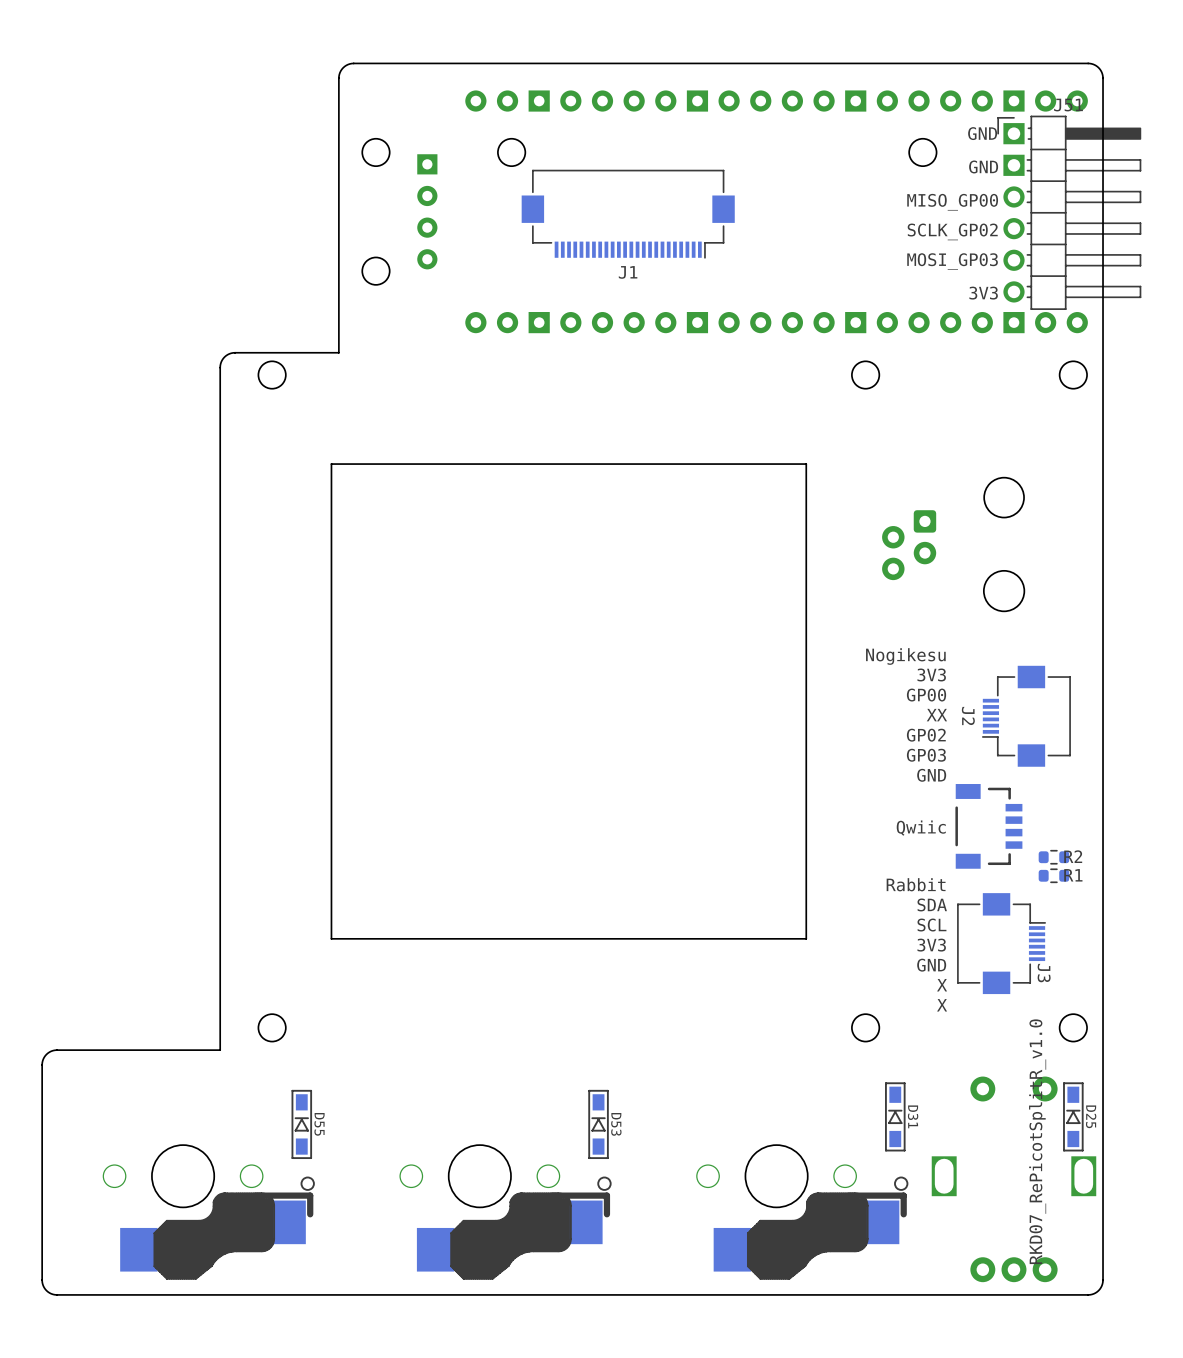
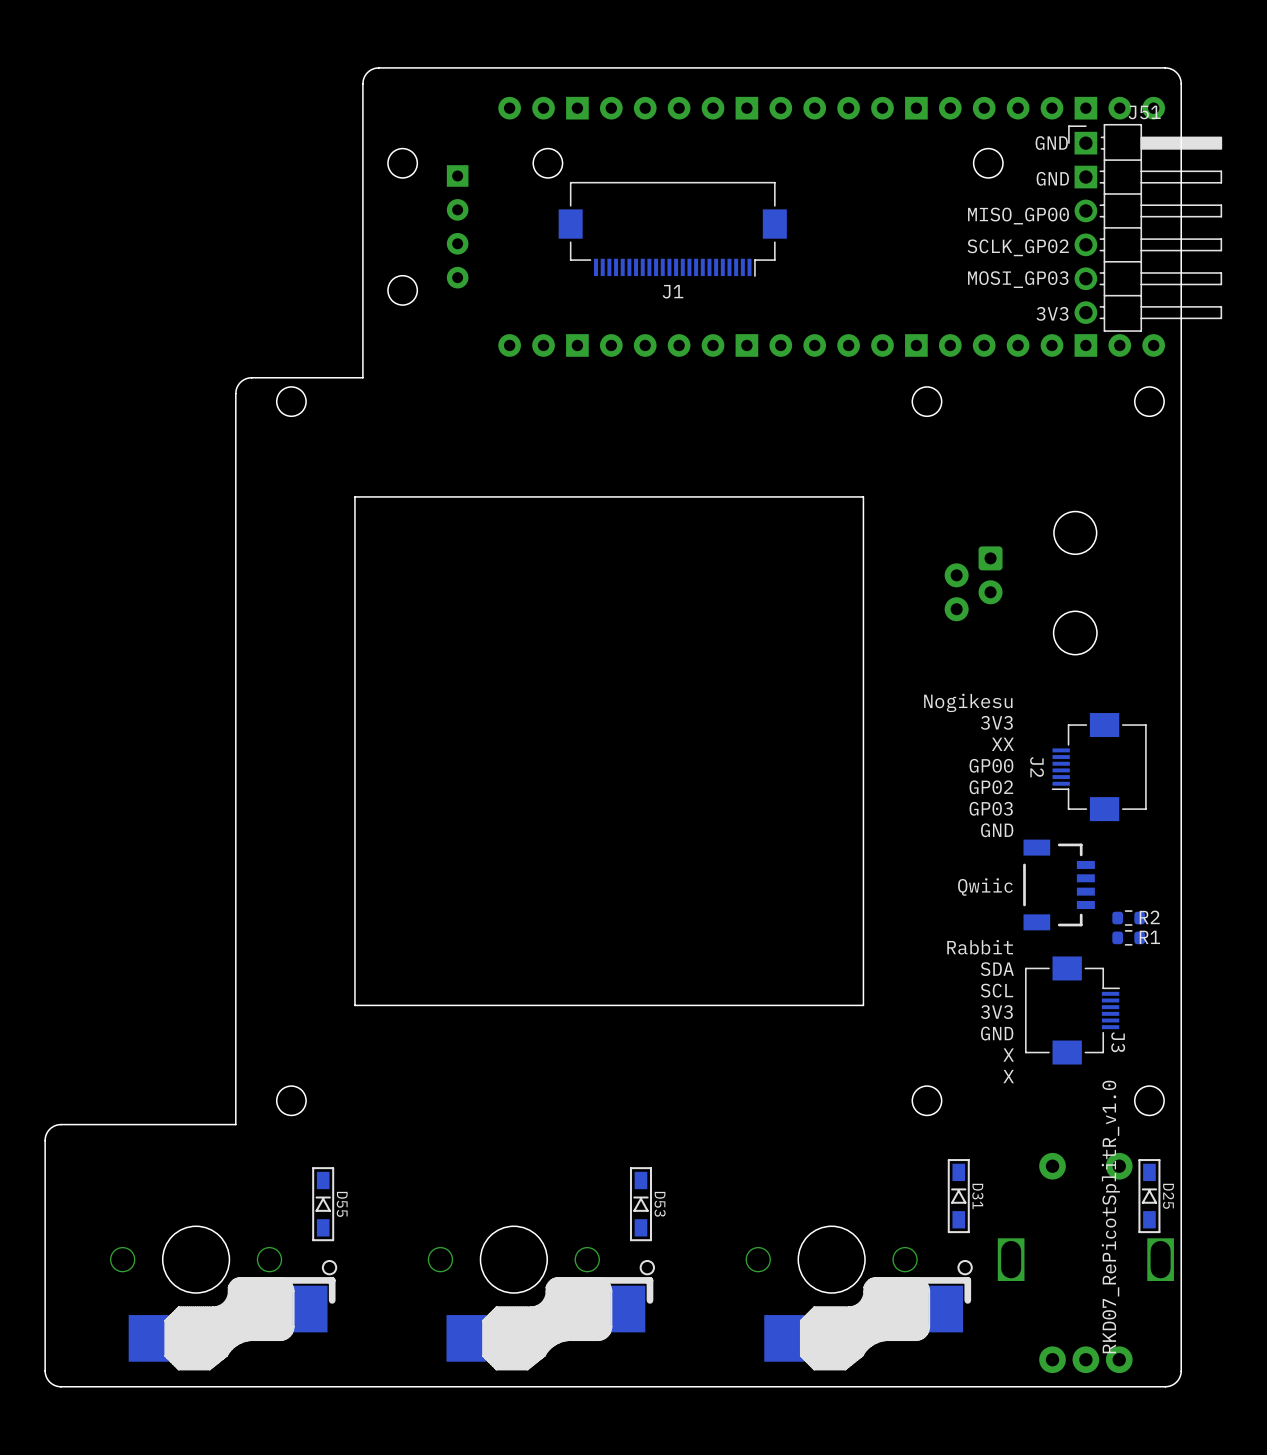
text: GP00 (926, 695) -> XX (1002, 744)
text: XX (936, 715) -> GP00 (991, 765)

